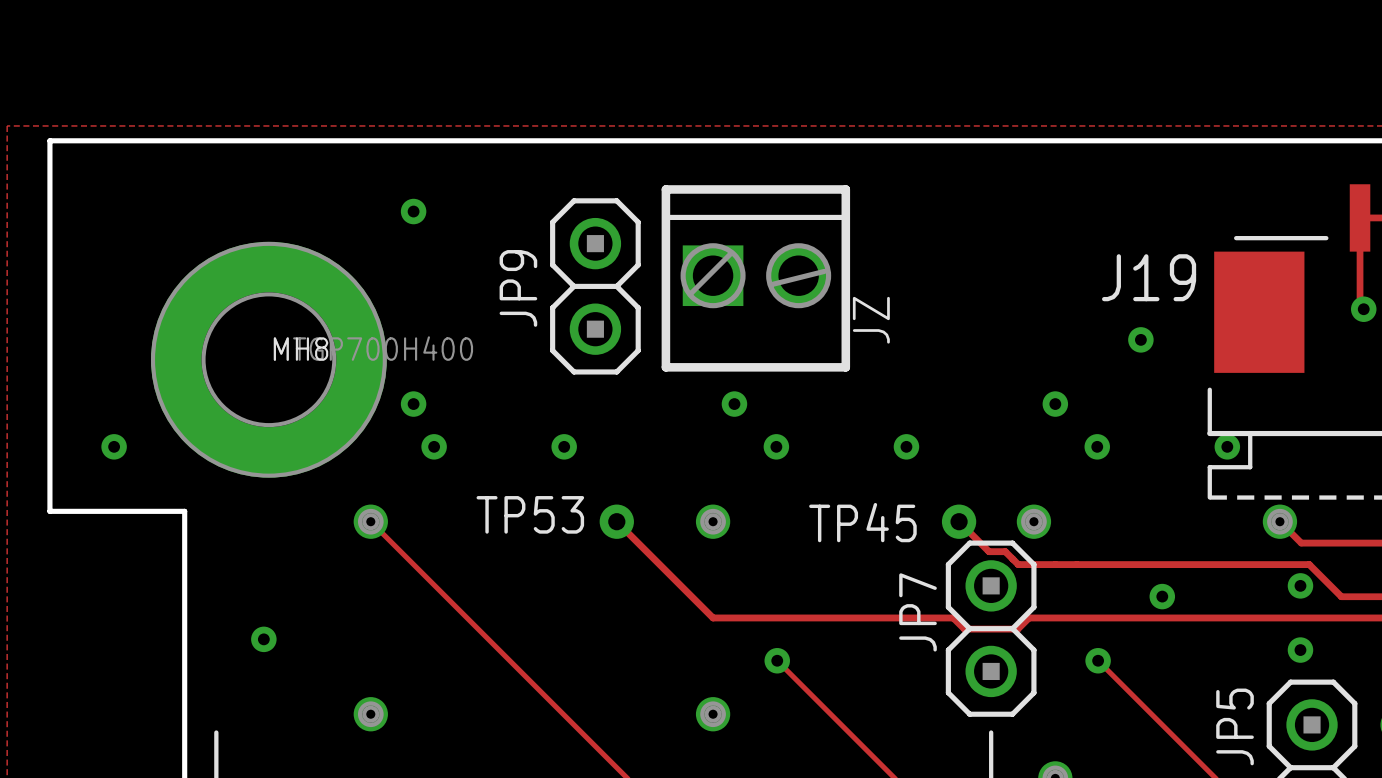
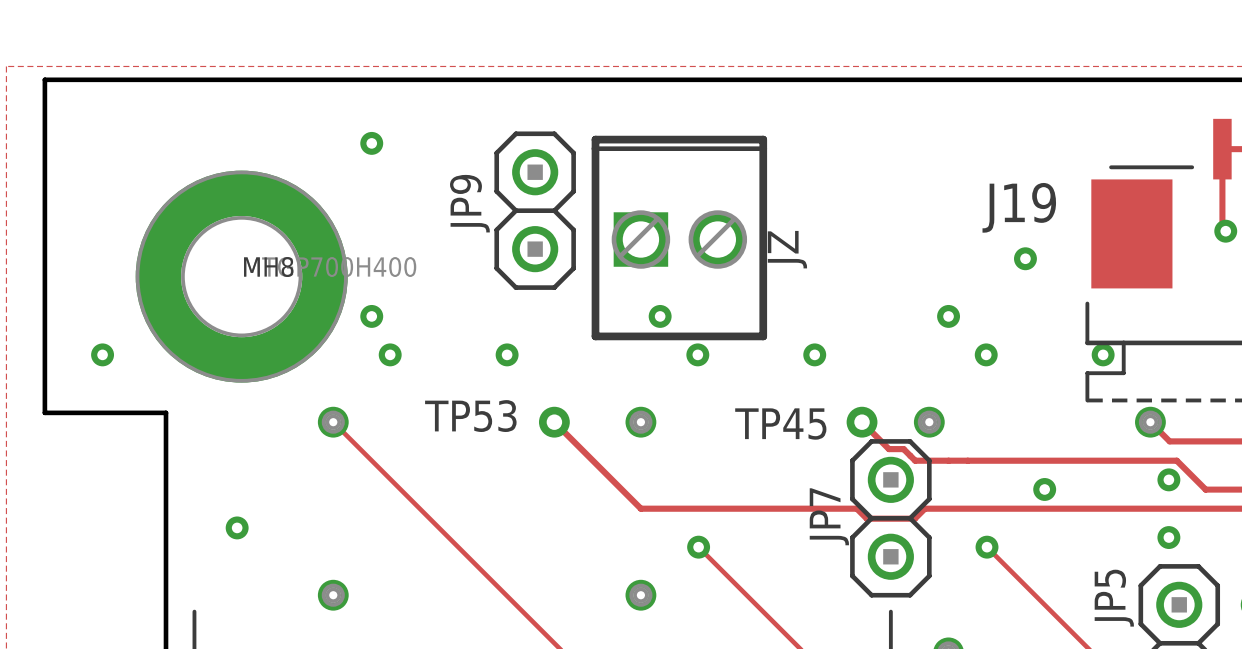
JZ: (755, 278) -> none
JZ: none -> (679, 238)

